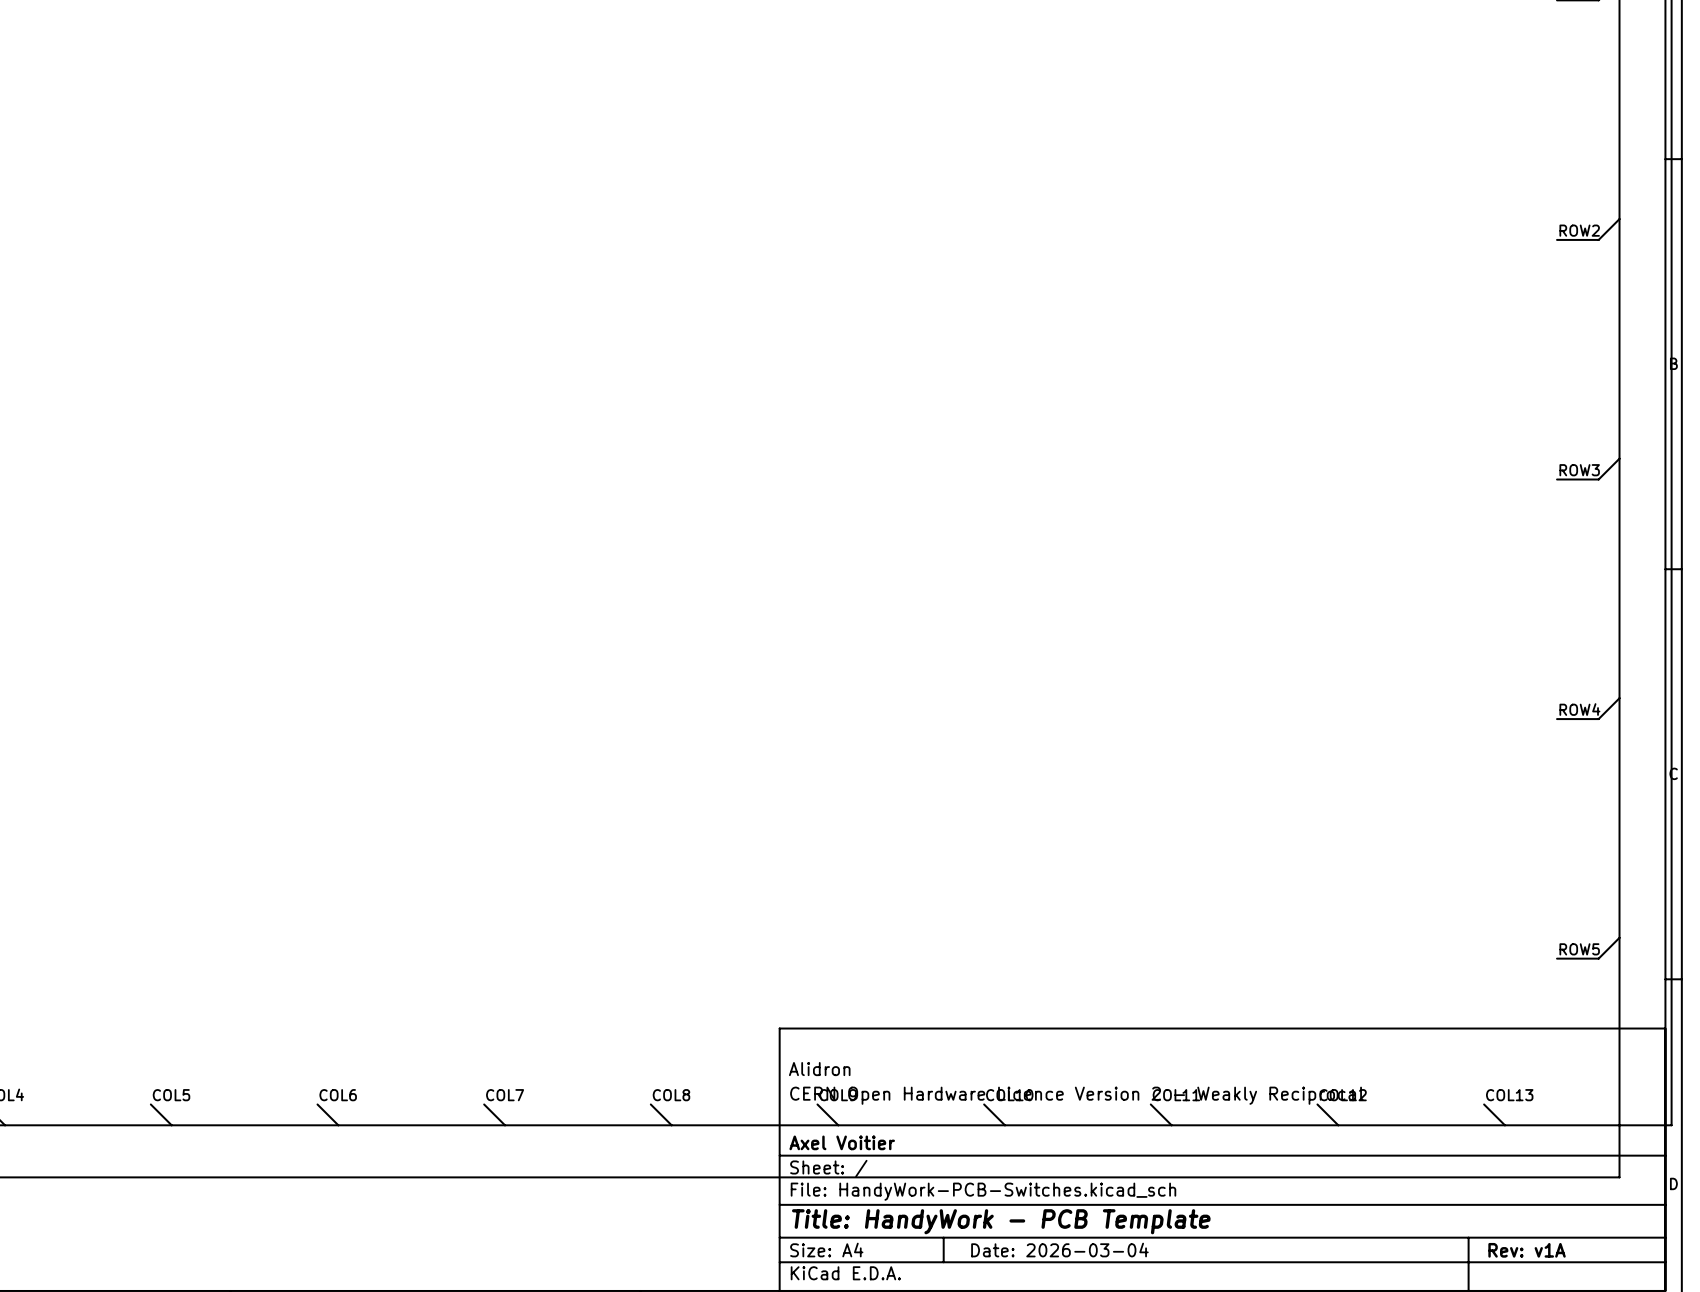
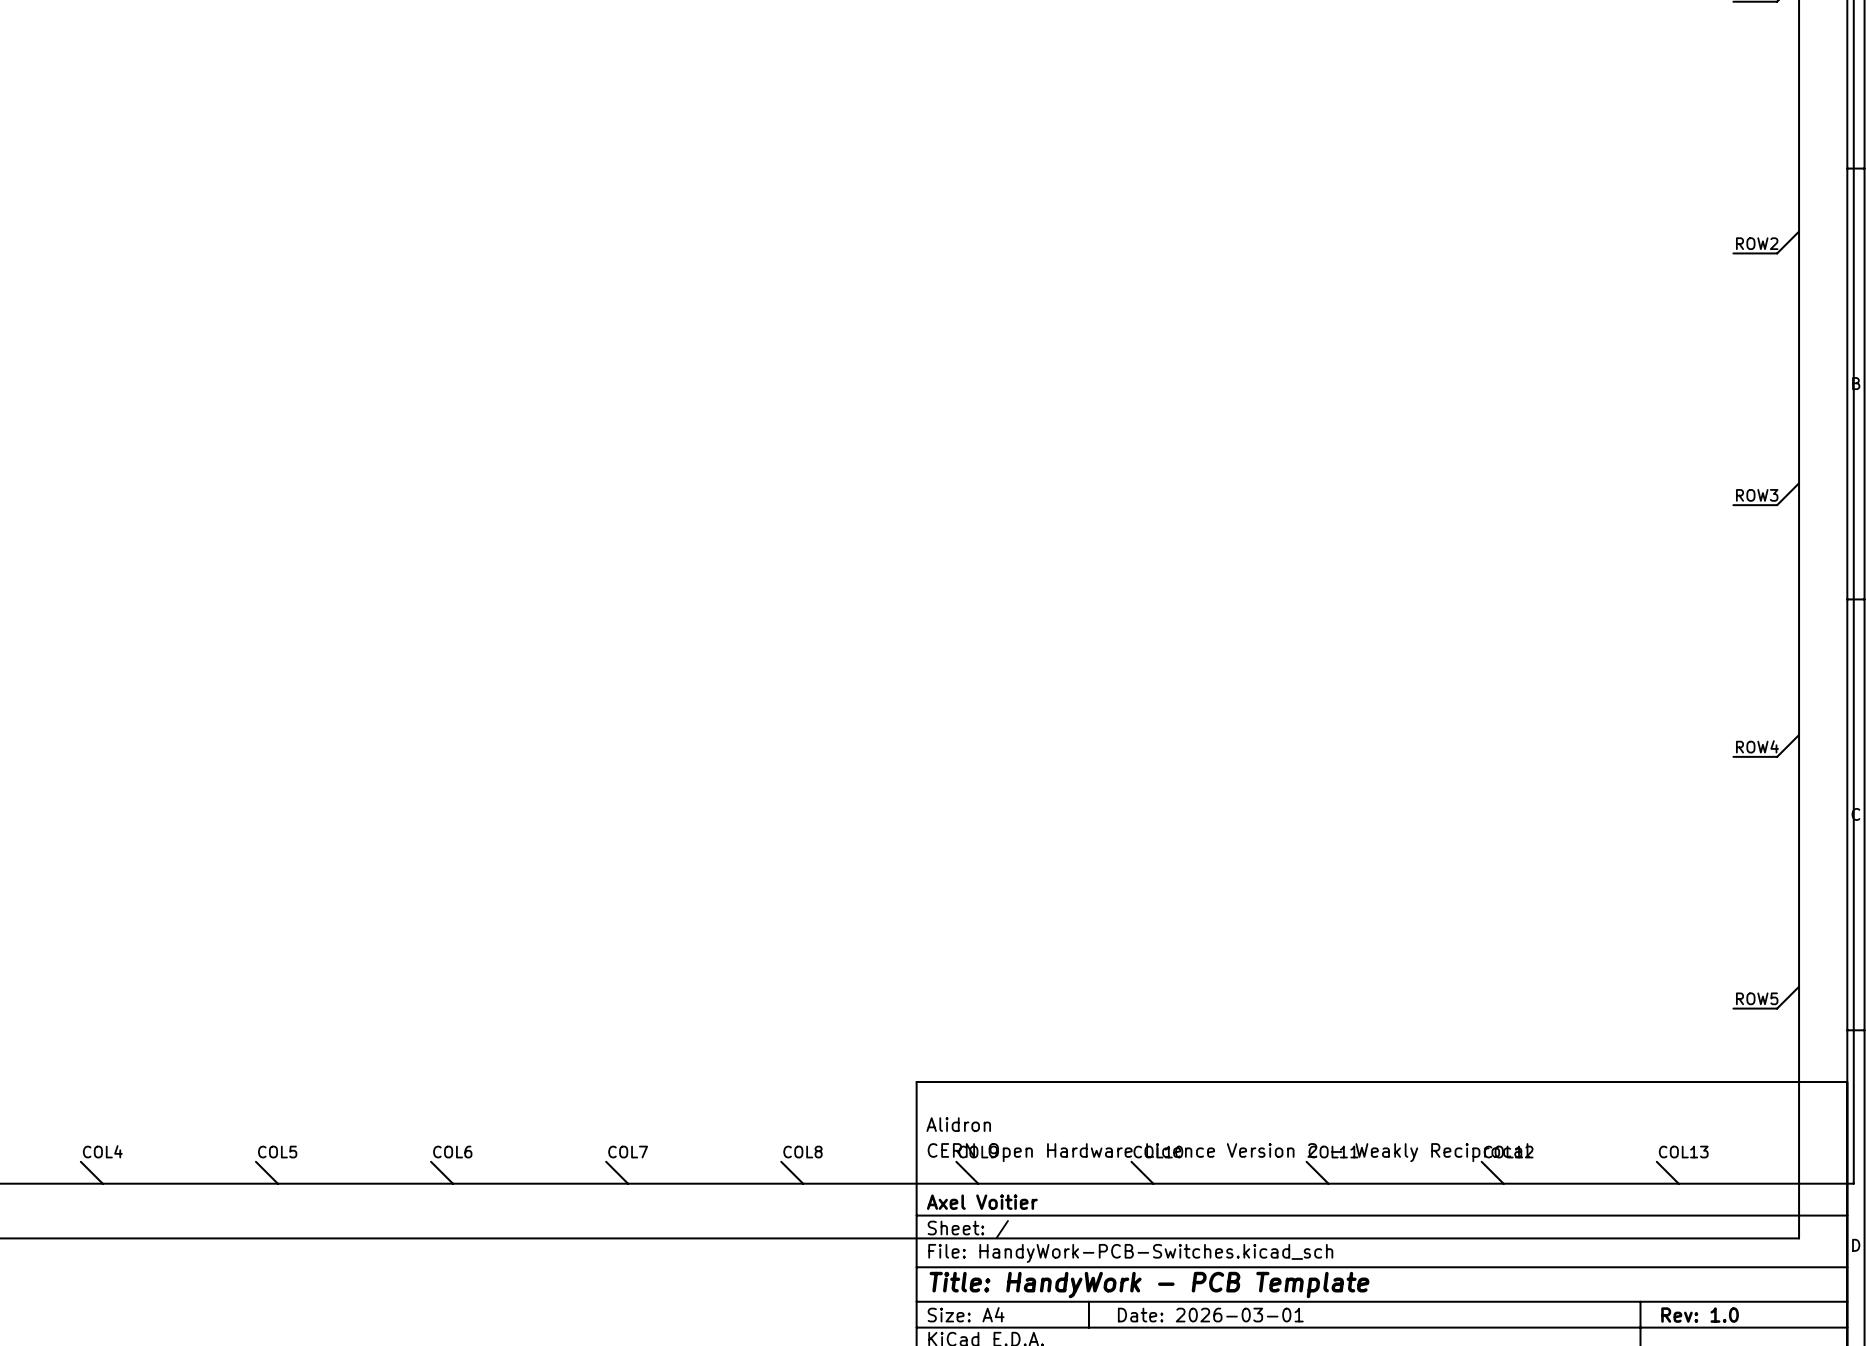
title block: Date: 2026-03-04 (1059, 1250) -> Date: 2026-03-01 (1210, 1315)
title block: Rev: v1A (1527, 1250) -> Rev: 1.0 (1700, 1315)

